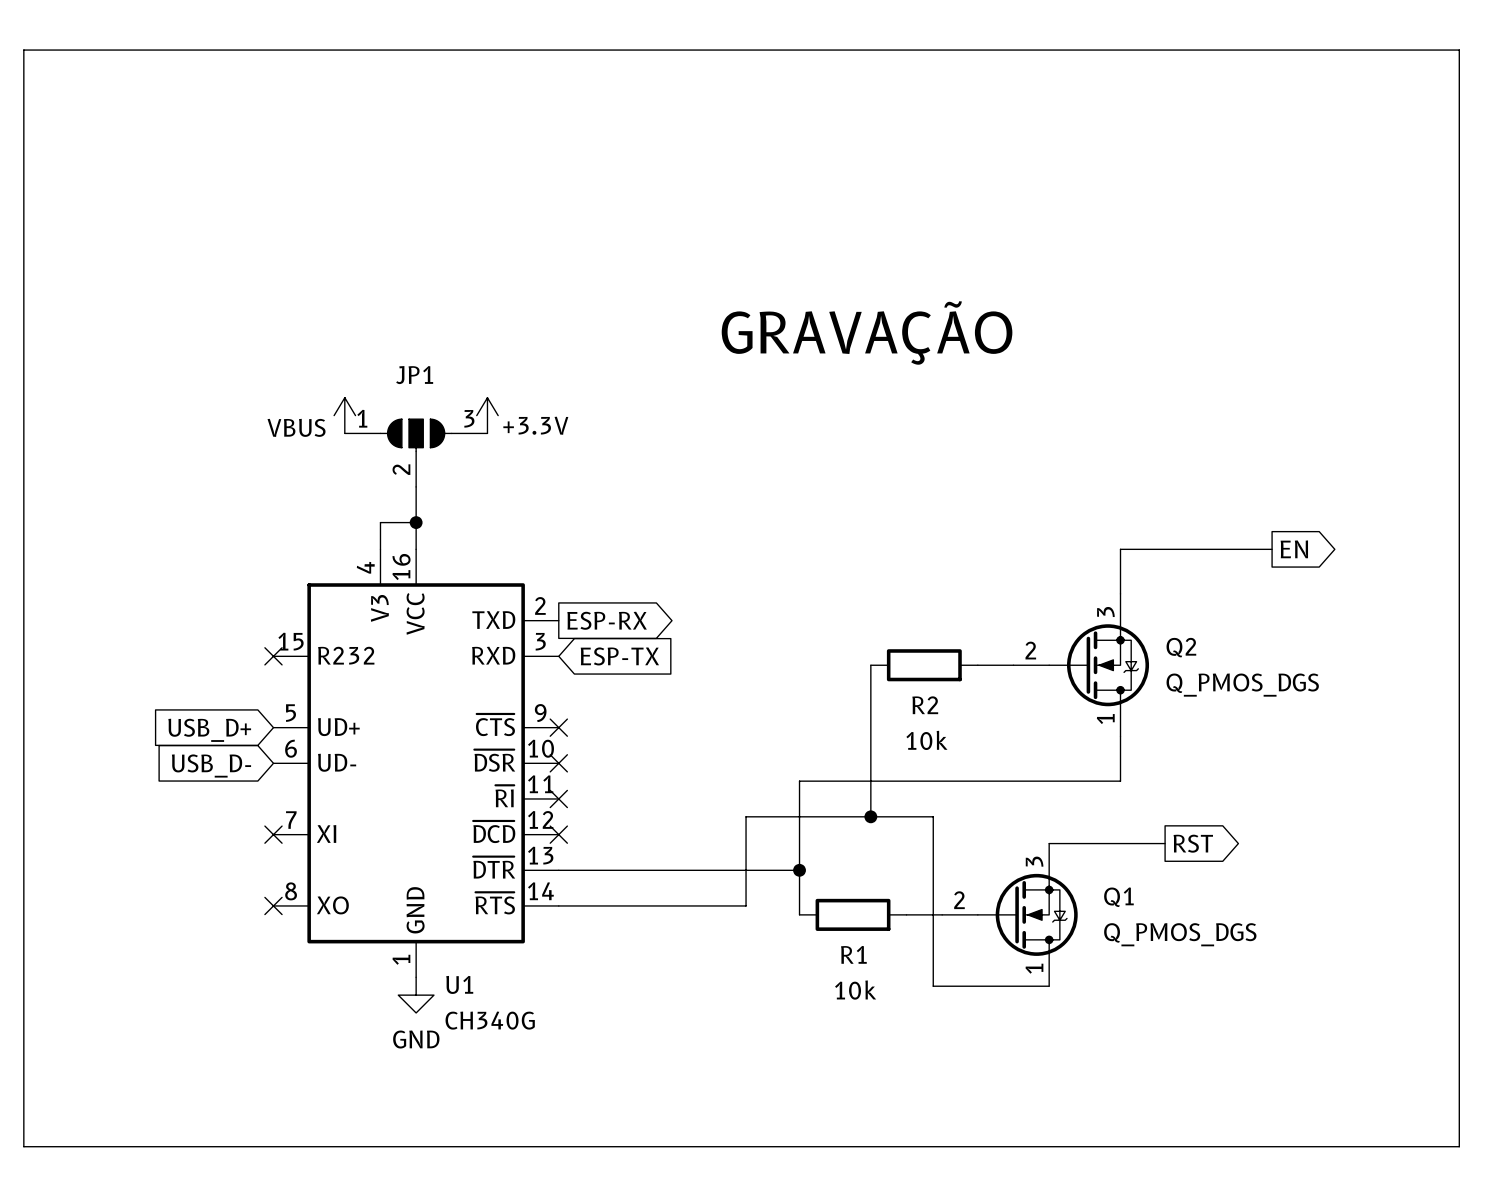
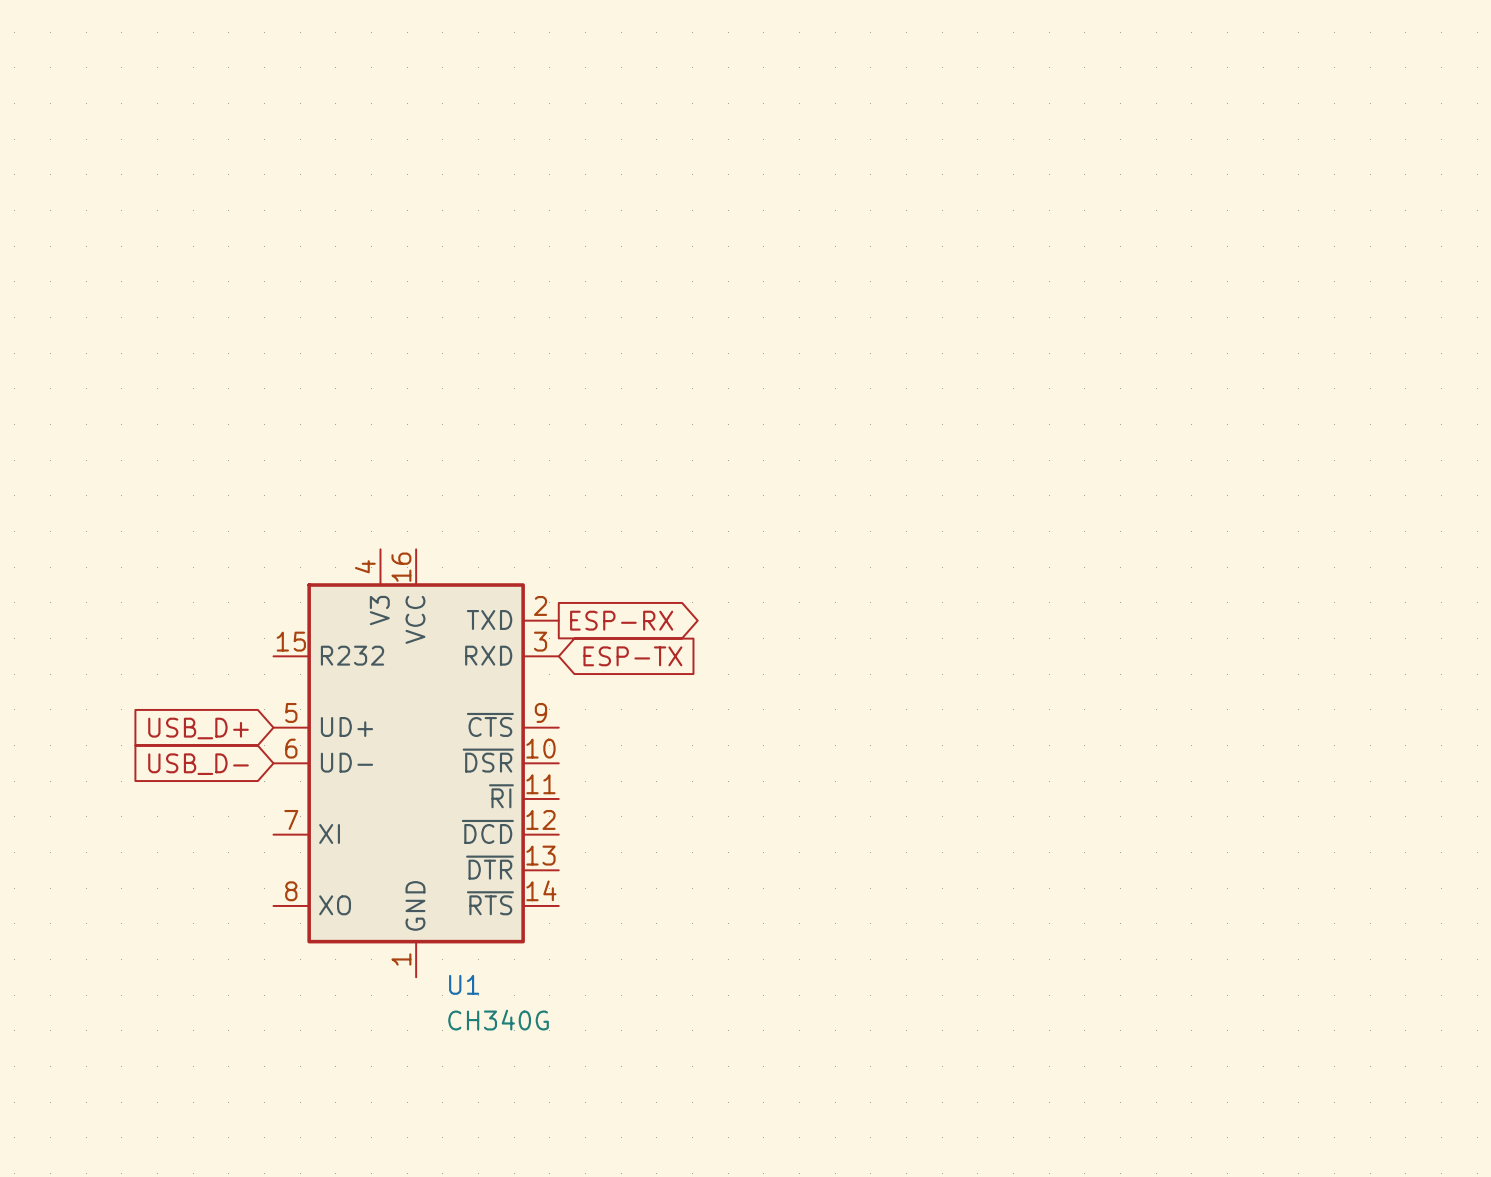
line: (23, 50) (1459, 50) (1459, 1146) (23, 1146) (23, 50) -> none
text: GRAVAÇÃO (867, 333) -> none
power symbol: VBUS (344, 415) -> none
power symbol: +3.3V (487, 415) -> none
JP1: (416, 453) -> none
wire: (416, 486) (416, 549) -> none
wire: (416, 522) (380, 522) (380, 549) -> none
junction: (416, 522) -> none
wire: (1272, 549) (1120, 549) (1120, 593) -> none
global label: EN (1294, 549) -> none
no-connect mark: (273, 656) -> none
wire: (870, 665) (870, 816) -> none
R2: 10k (924, 665) -> none
wire: (977, 665) (1013, 665) -> none
Q2: Q_PMOS_DGS (1081, 665) -> none
no-connect mark: (558, 727) -> none
wire: (1120, 736) (1120, 781) (799, 781) (799, 914) -> none
no-connect mark: (558, 763) -> none
no-connect mark: (558, 798) -> none
junction: (870, 816) -> none
no-connect mark: (273, 834) -> none
no-connect mark: (558, 834) -> none
wire: (1049, 843) (1165, 843) -> none
global label: RST (1193, 843) -> none
wire: (558, 870) (799, 870) -> none
junction: (799, 870) -> none
no-connect mark: (273, 905) -> none
wire: (558, 905) (746, 905) (746, 816) (933, 816) (933, 986) (1049, 986) -> none
R1: 10k (853, 914) -> none
wire: (906, 914) (942, 914) -> none
Q1: Q_PMOS_DGS (1009, 914) -> none
power symbol: GND (416, 995) -> none

